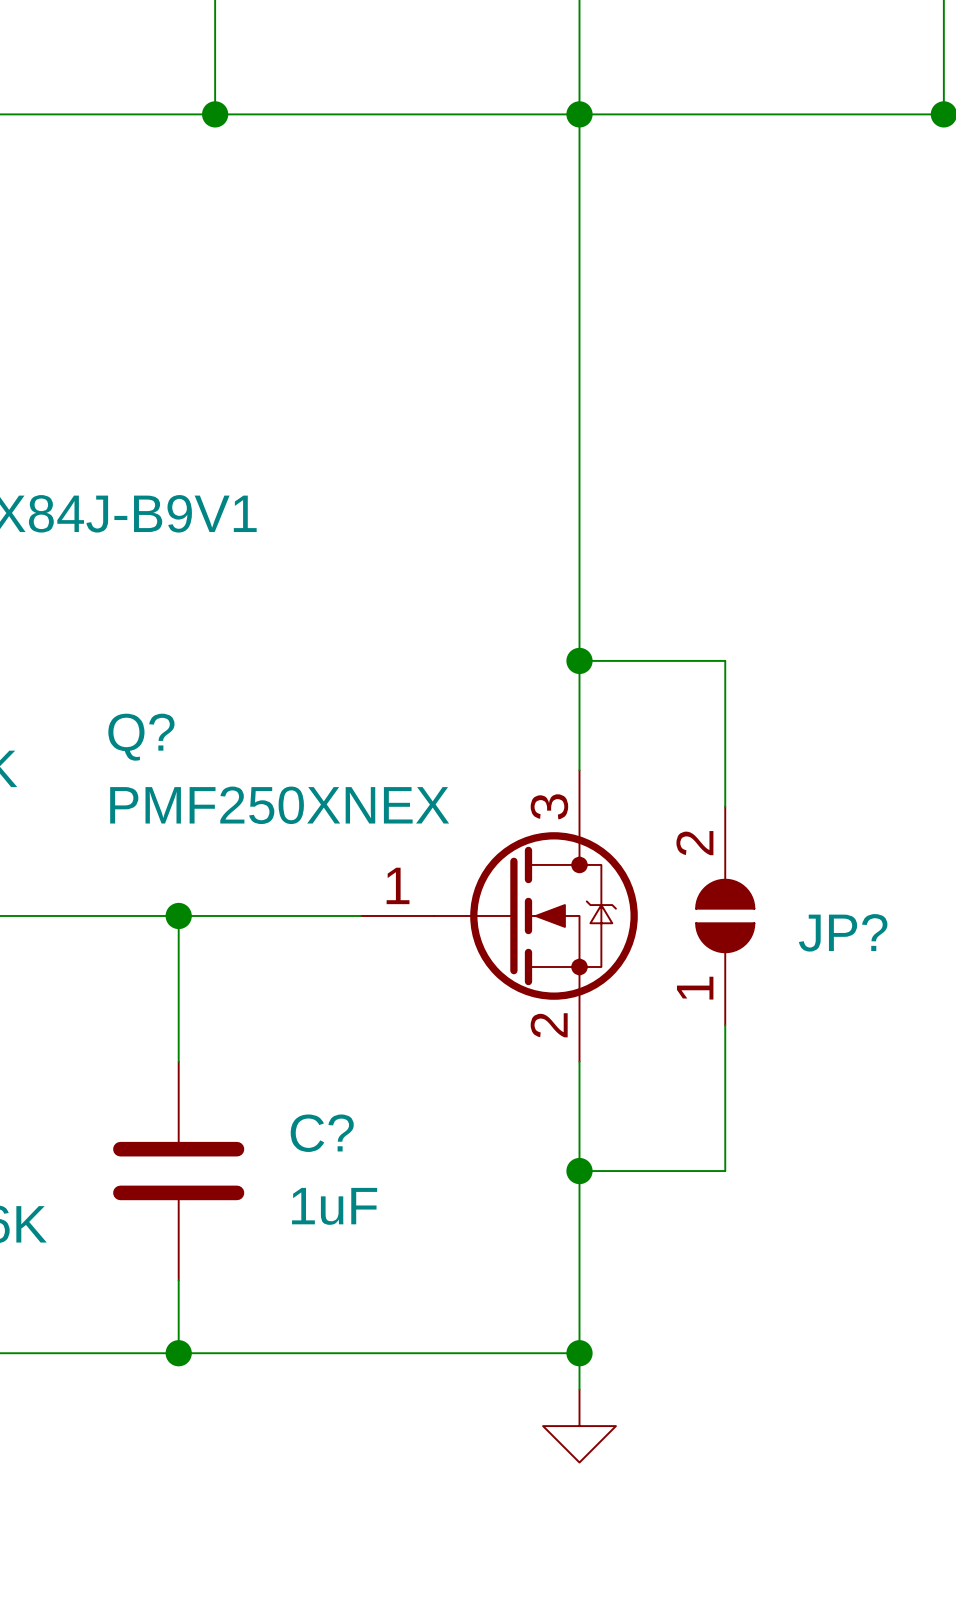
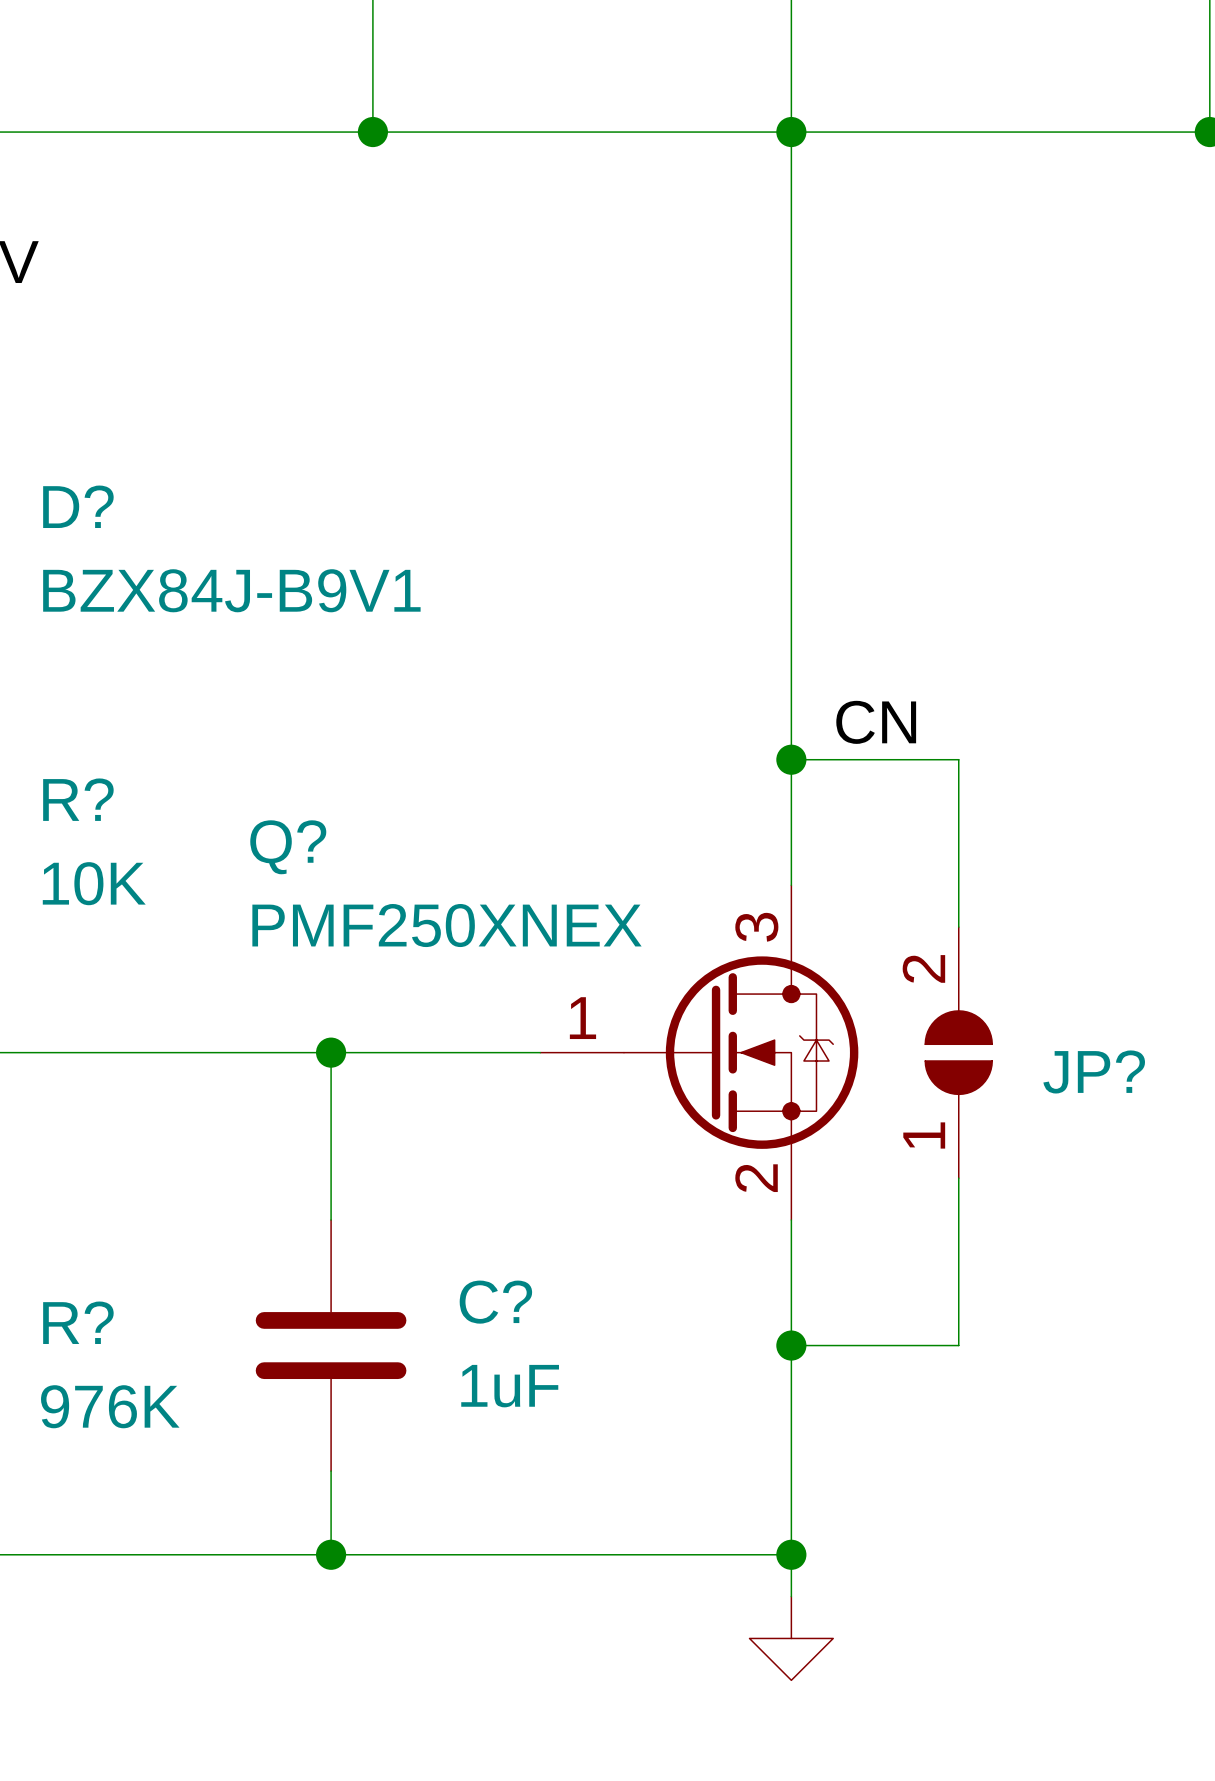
label: none -> CN (876, 722)

